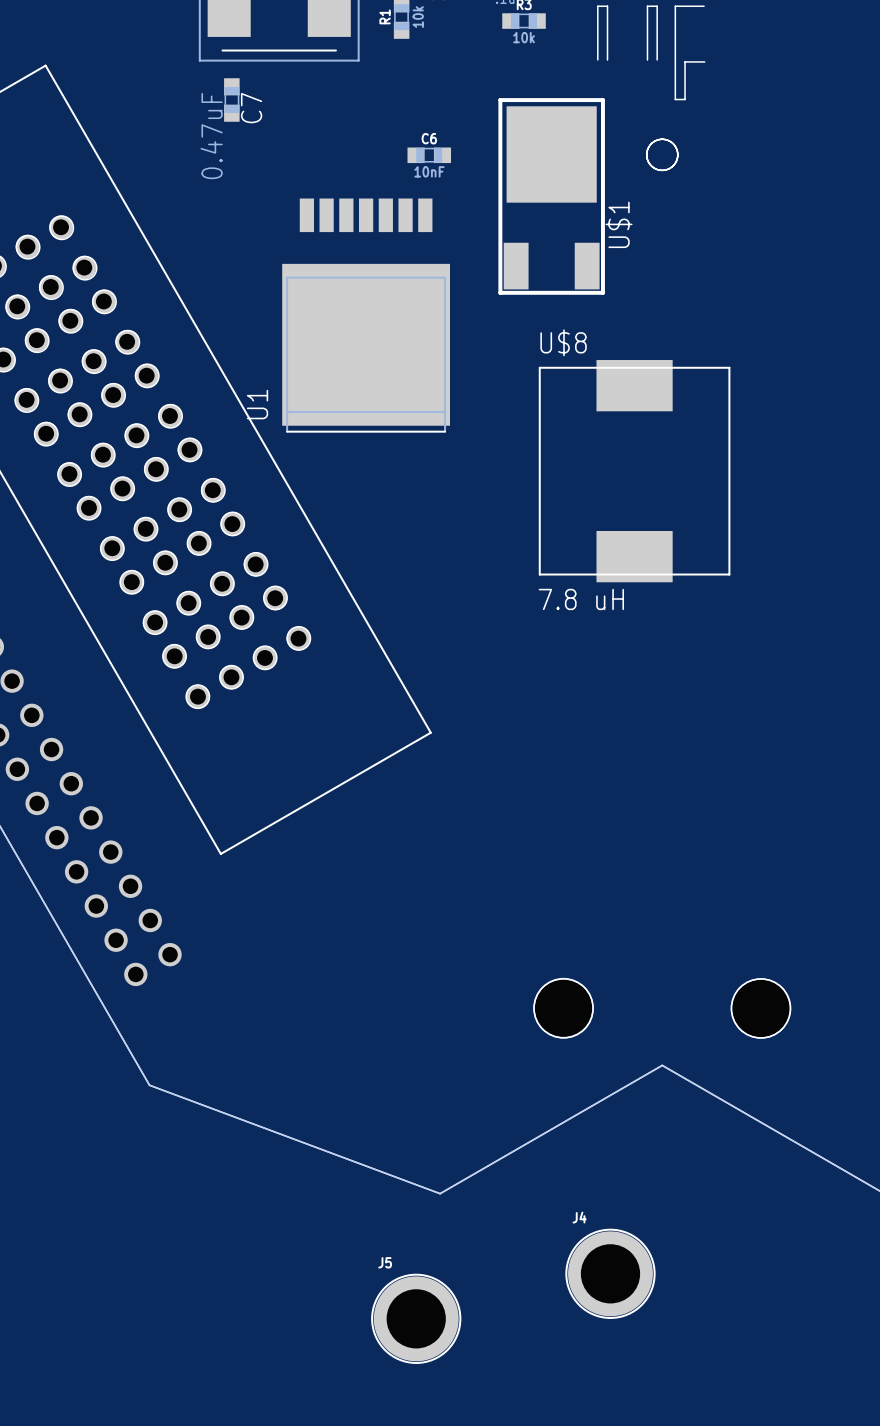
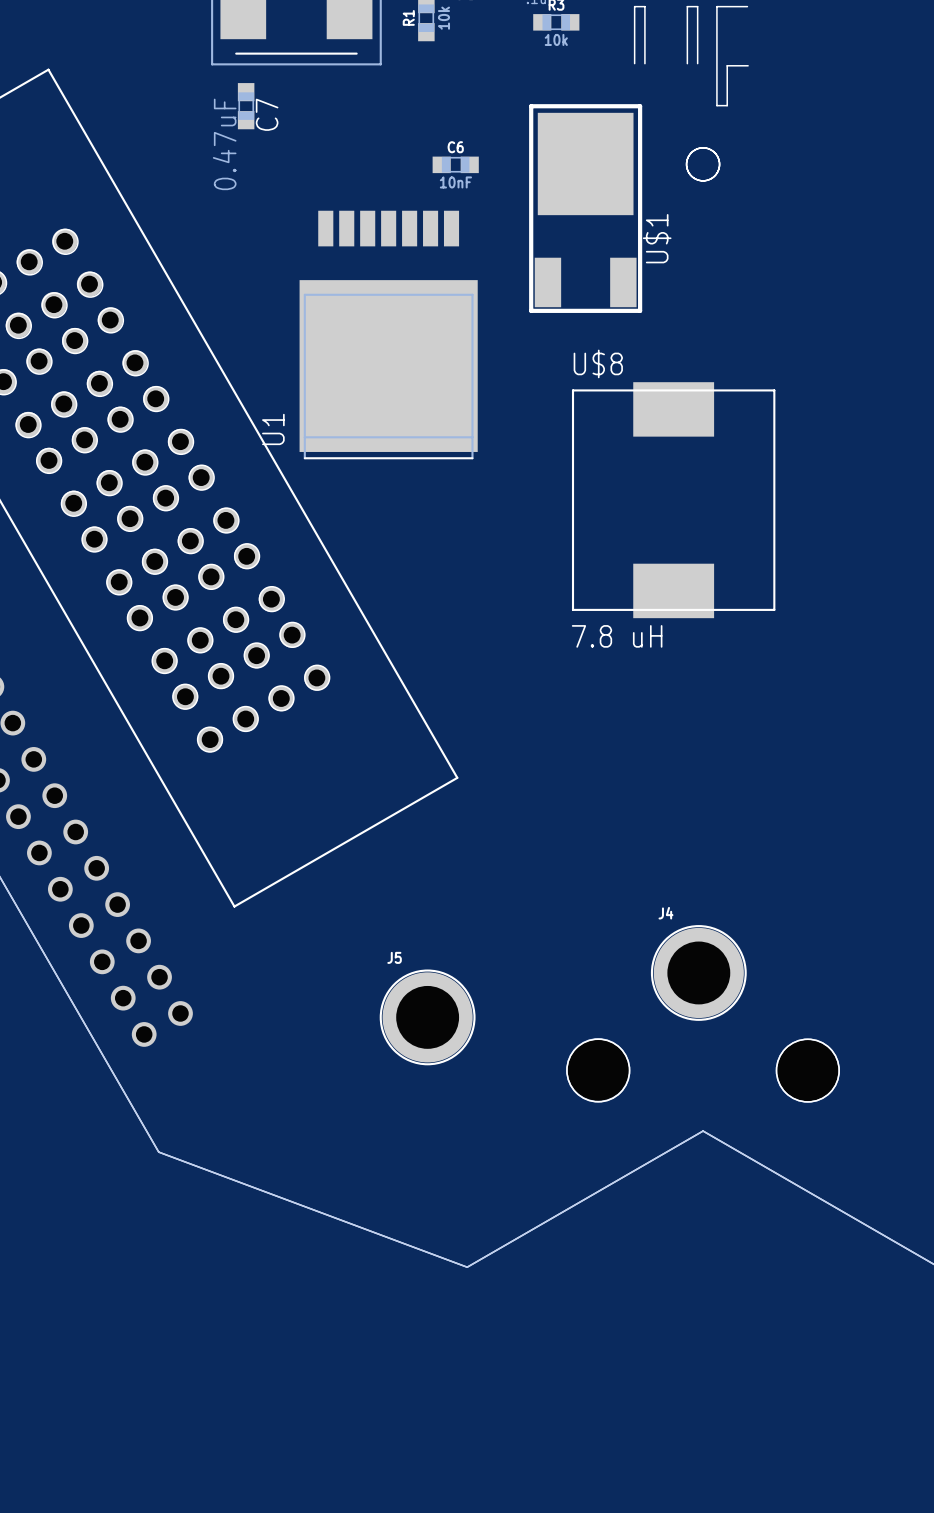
J4 position: (610, 1273) -> (698, 972)
J5 position: (416, 1318) -> (427, 1017)

